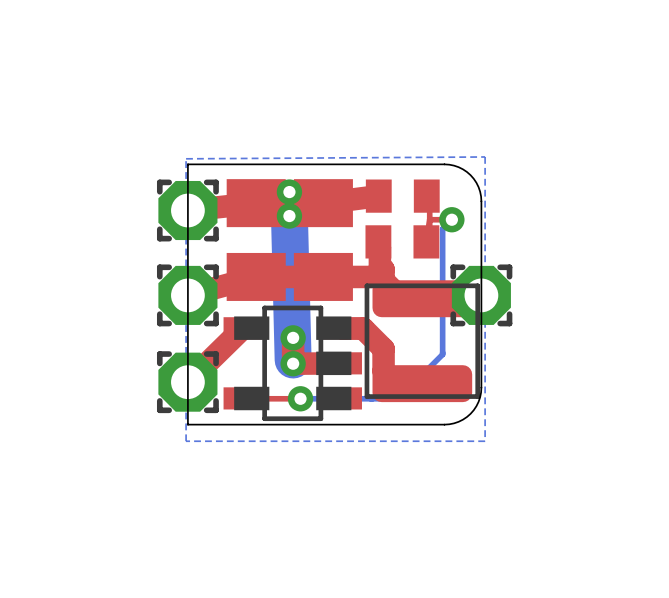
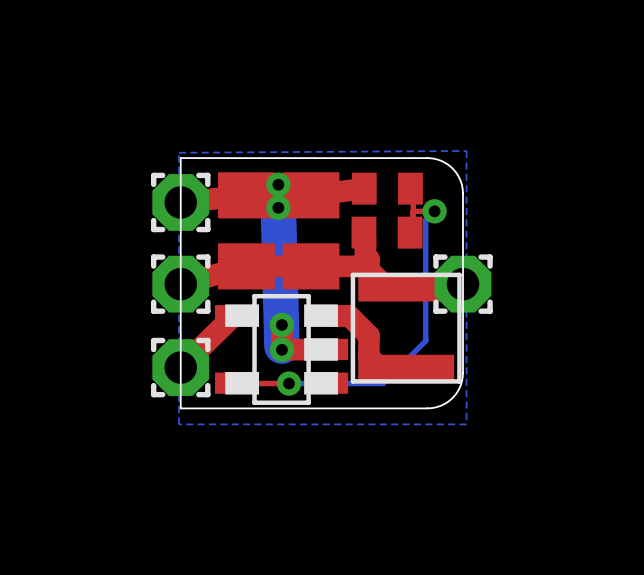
part footprint: [364, 280, 481, 403] -> [350, 272, 462, 384]

